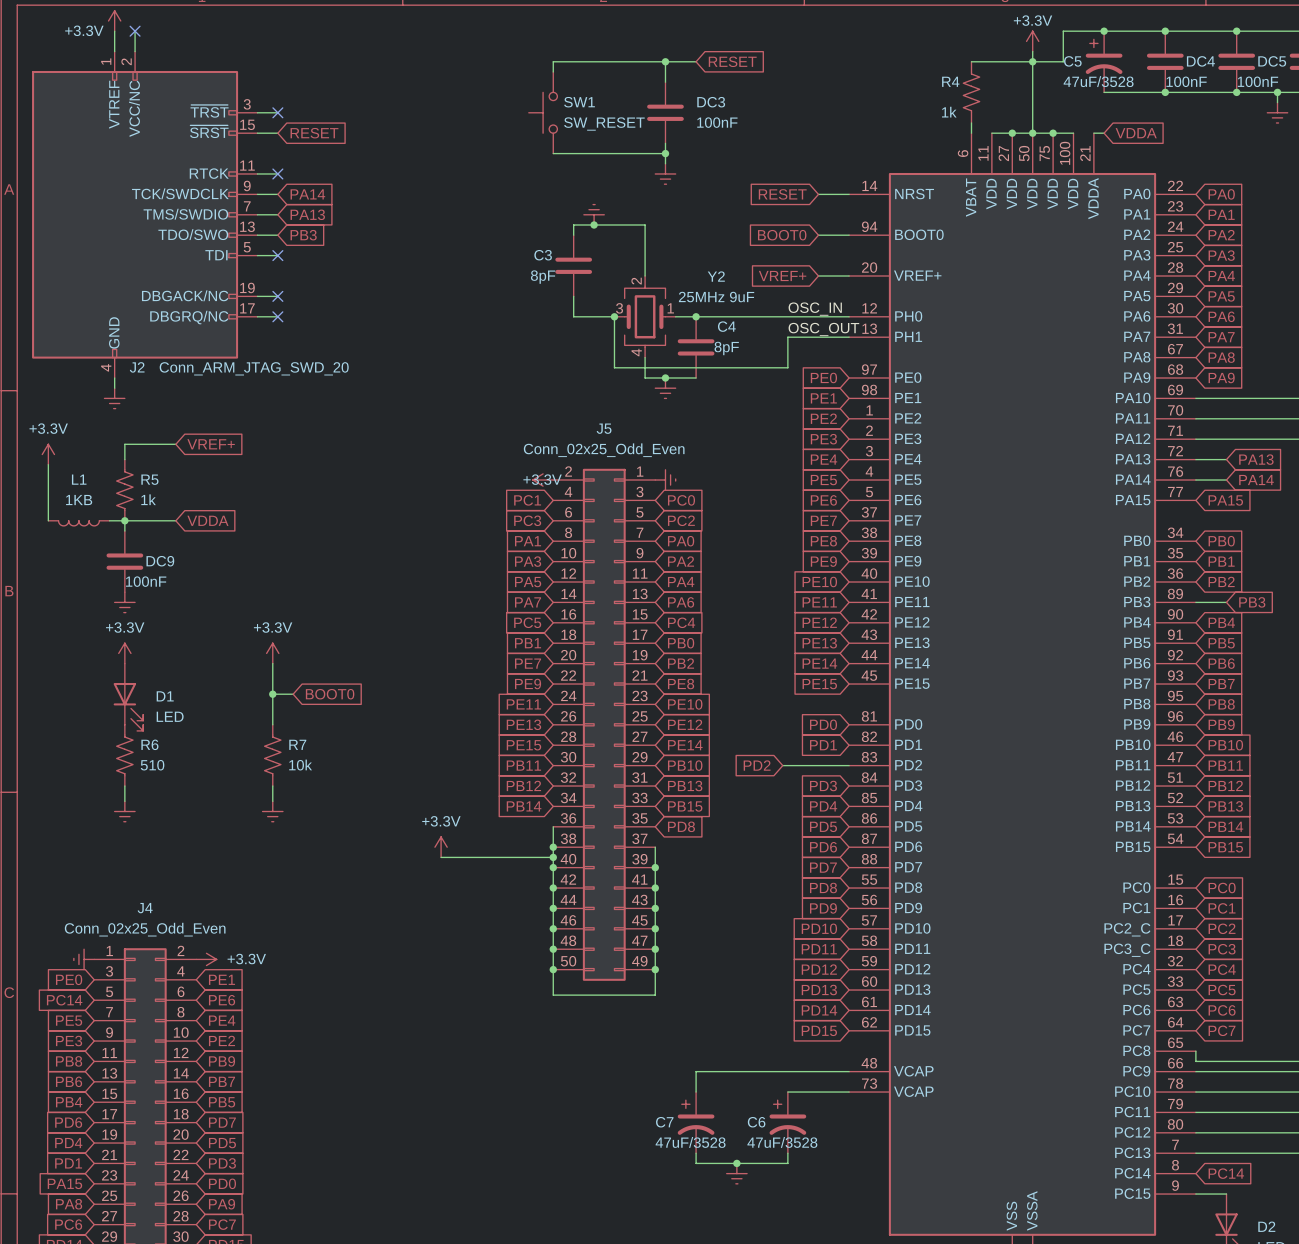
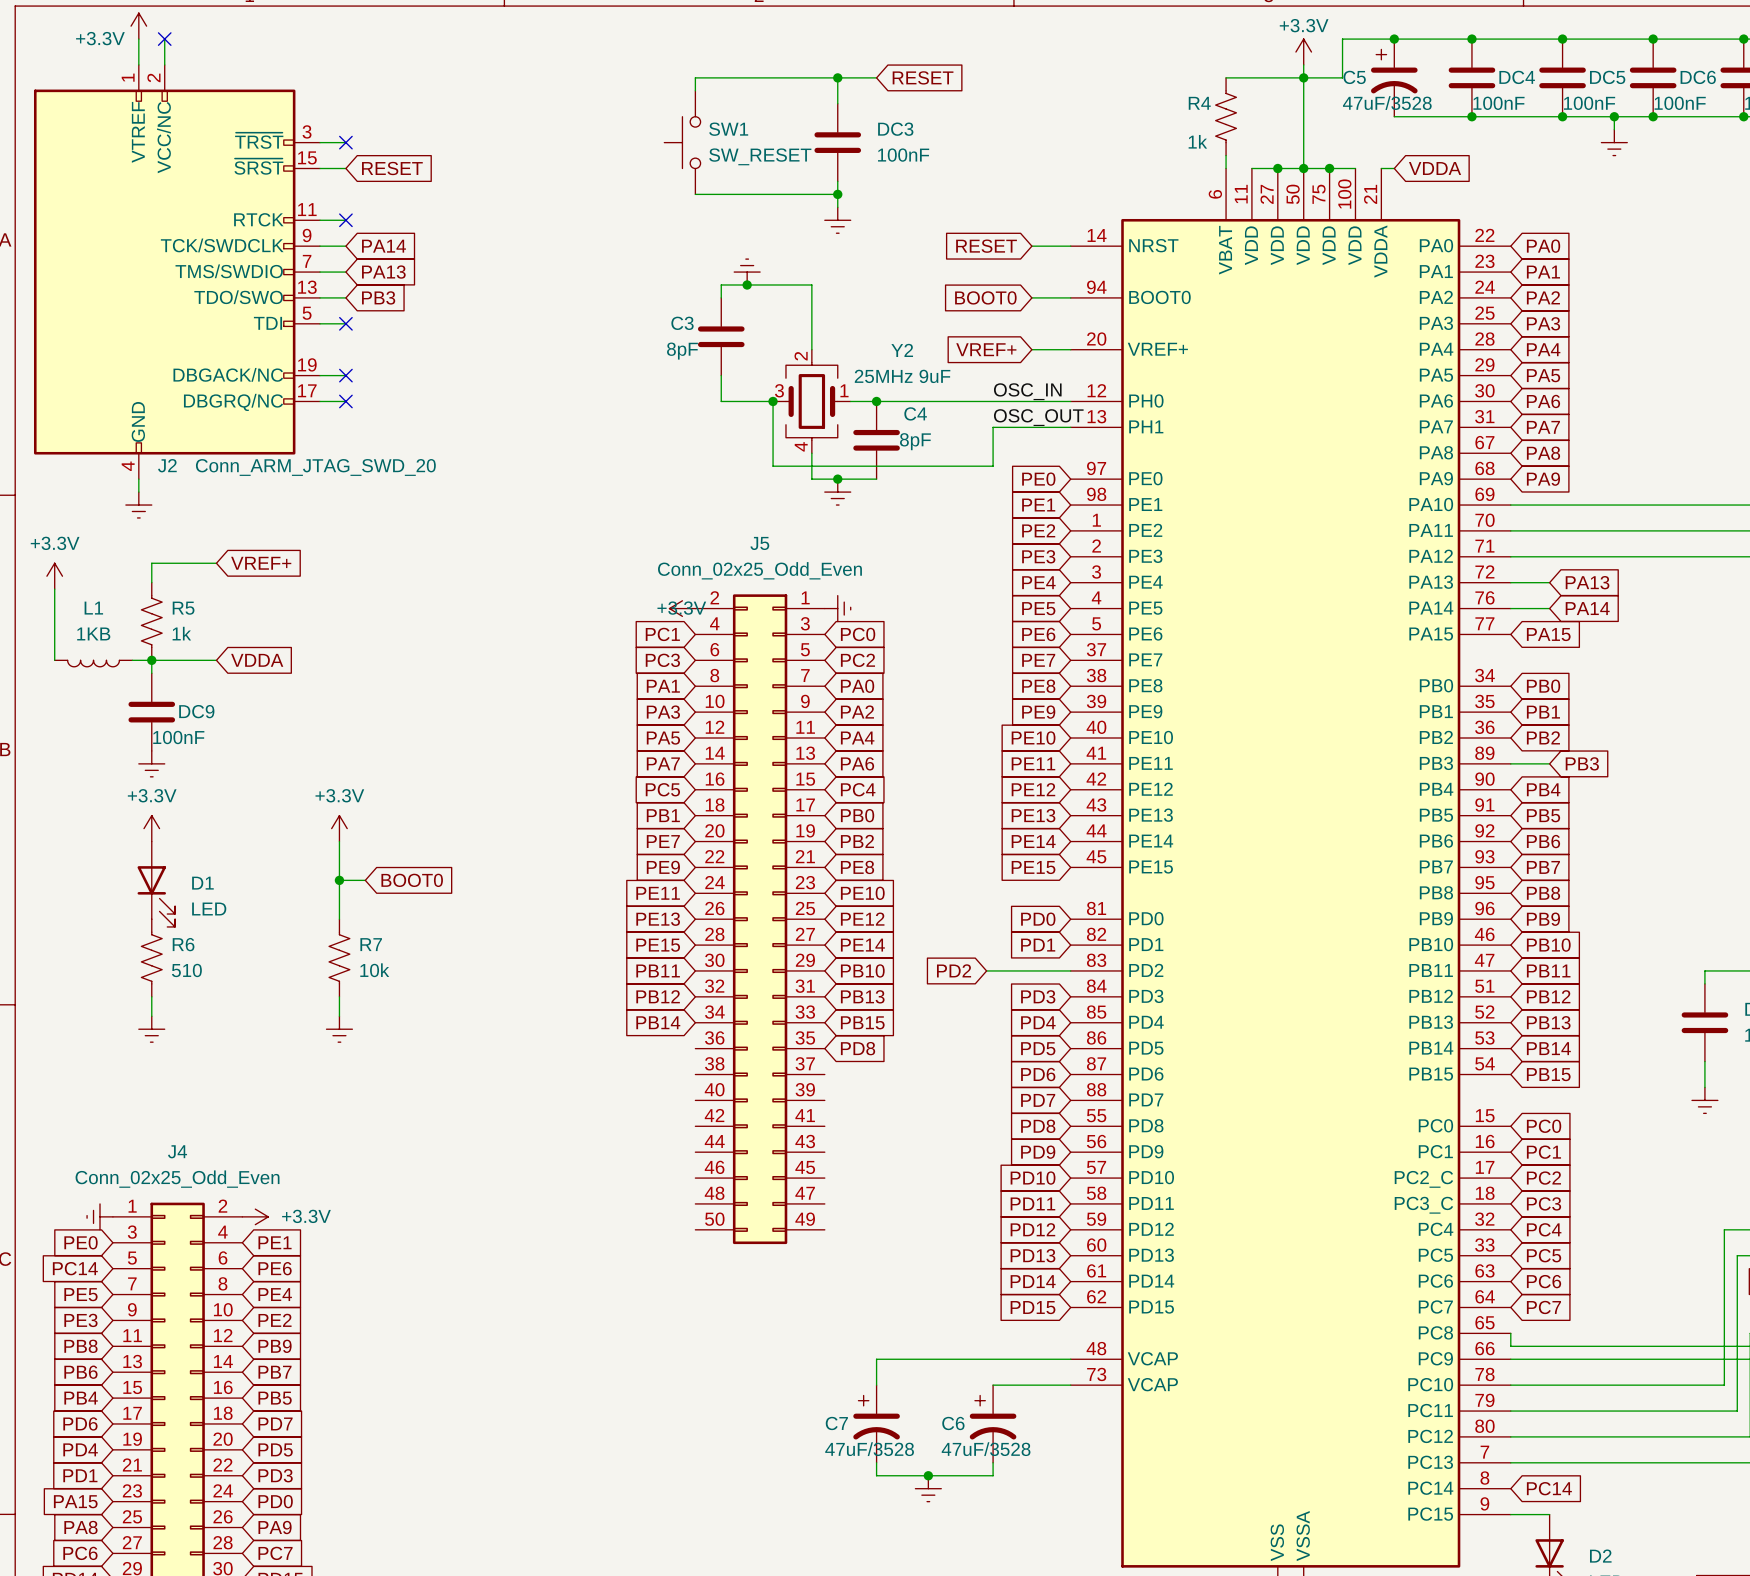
wire: (553, 826) (553, 995) (655, 995) (655, 847) -> none
power symbol: +3.3V (441, 847) -> none
junction: (553, 847) -> none
wire: (441, 857) (553, 857) -> none
junction: (553, 857) -> none
junction: (553, 867) -> none
junction: (655, 867) -> none
junction: (553, 888) -> none
junction: (655, 888) -> none
junction: (553, 908) -> none
junction: (655, 908) -> none
junction: (553, 928) -> none
junction: (655, 928) -> none
junction: (553, 949) -> none
junction: (655, 949) -> none
junction: (553, 969) -> none
junction: (655, 969) -> none

